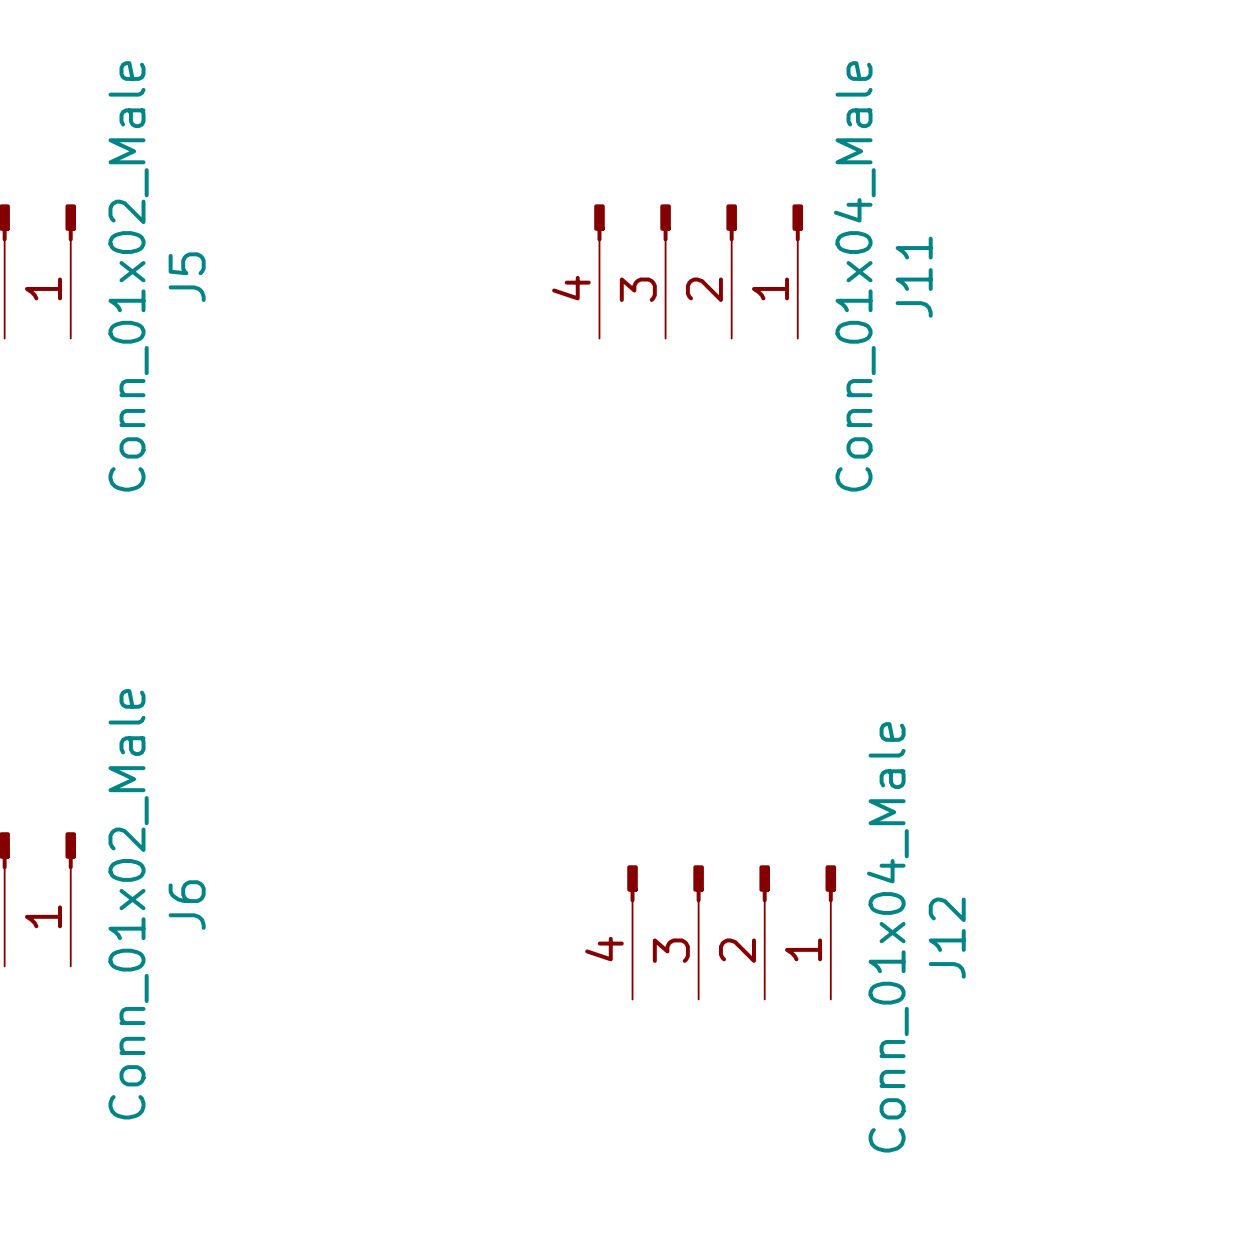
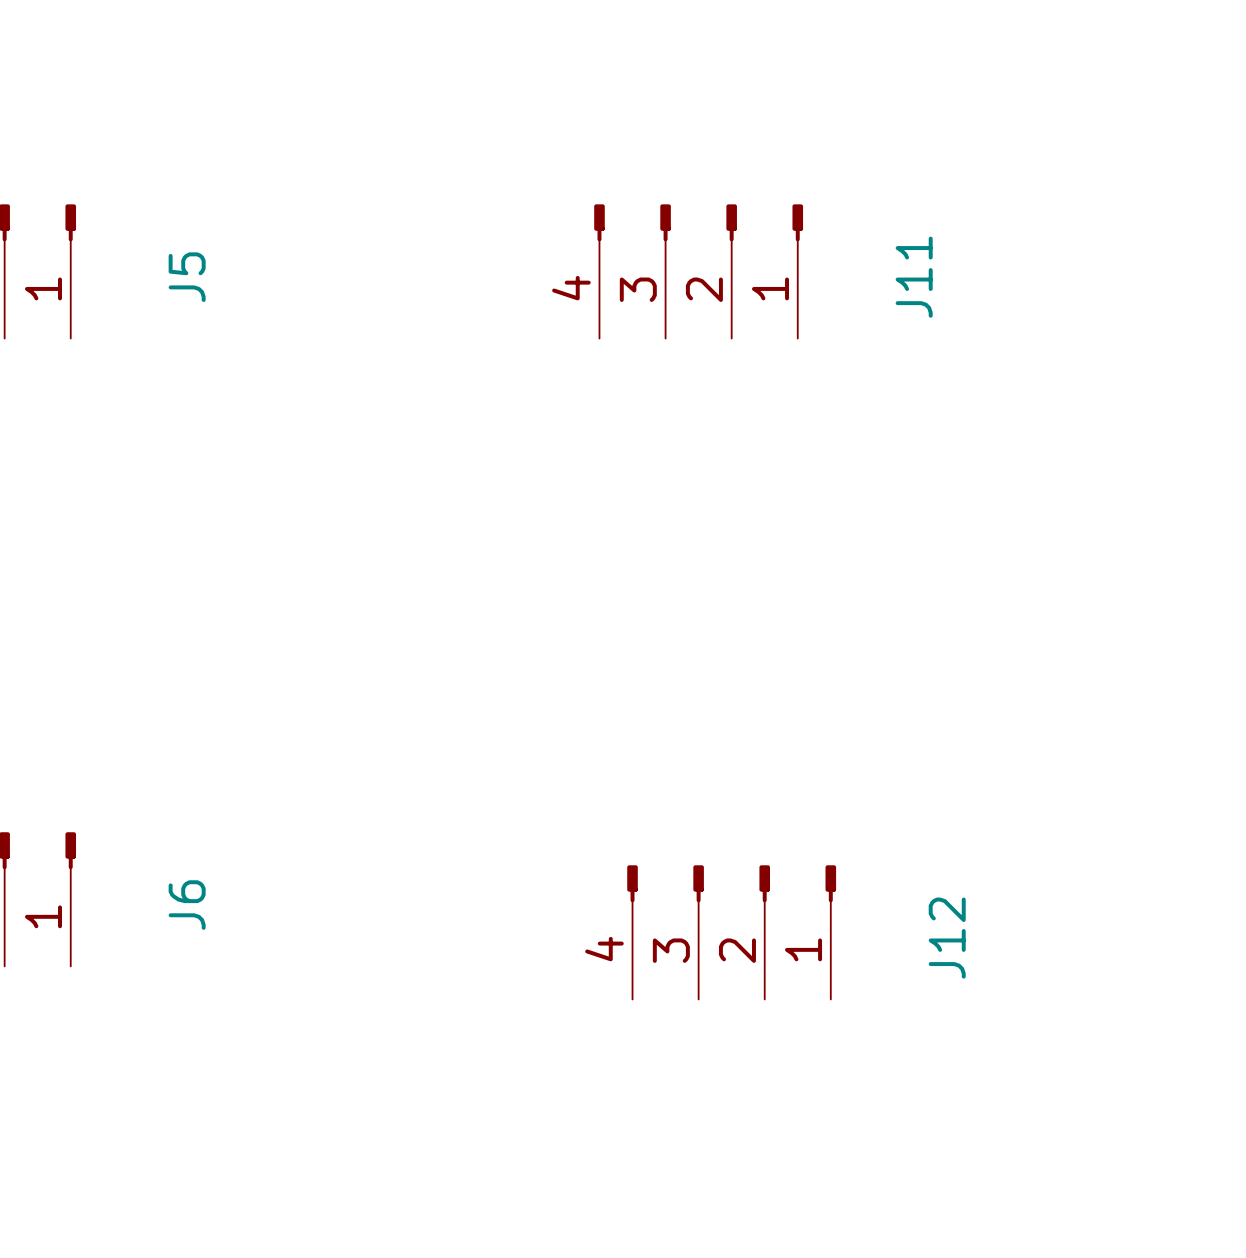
J5 value: Conn_01x02_Male (128, 276) -> none
J11 value: Conn_01x04_Male (854, 276) -> none
J6 value: Conn_01x02_Male (128, 904) -> none
J12 value: Conn_01x04_Male (887, 937) -> none

